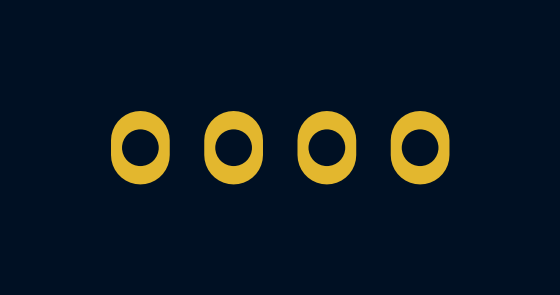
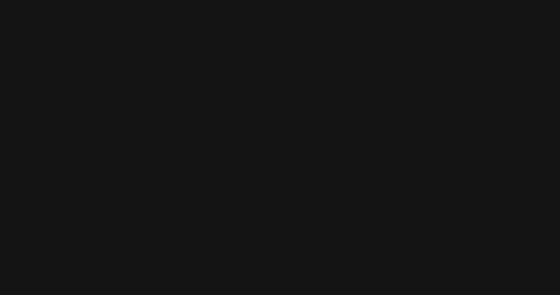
part: (280, 147) -> none

